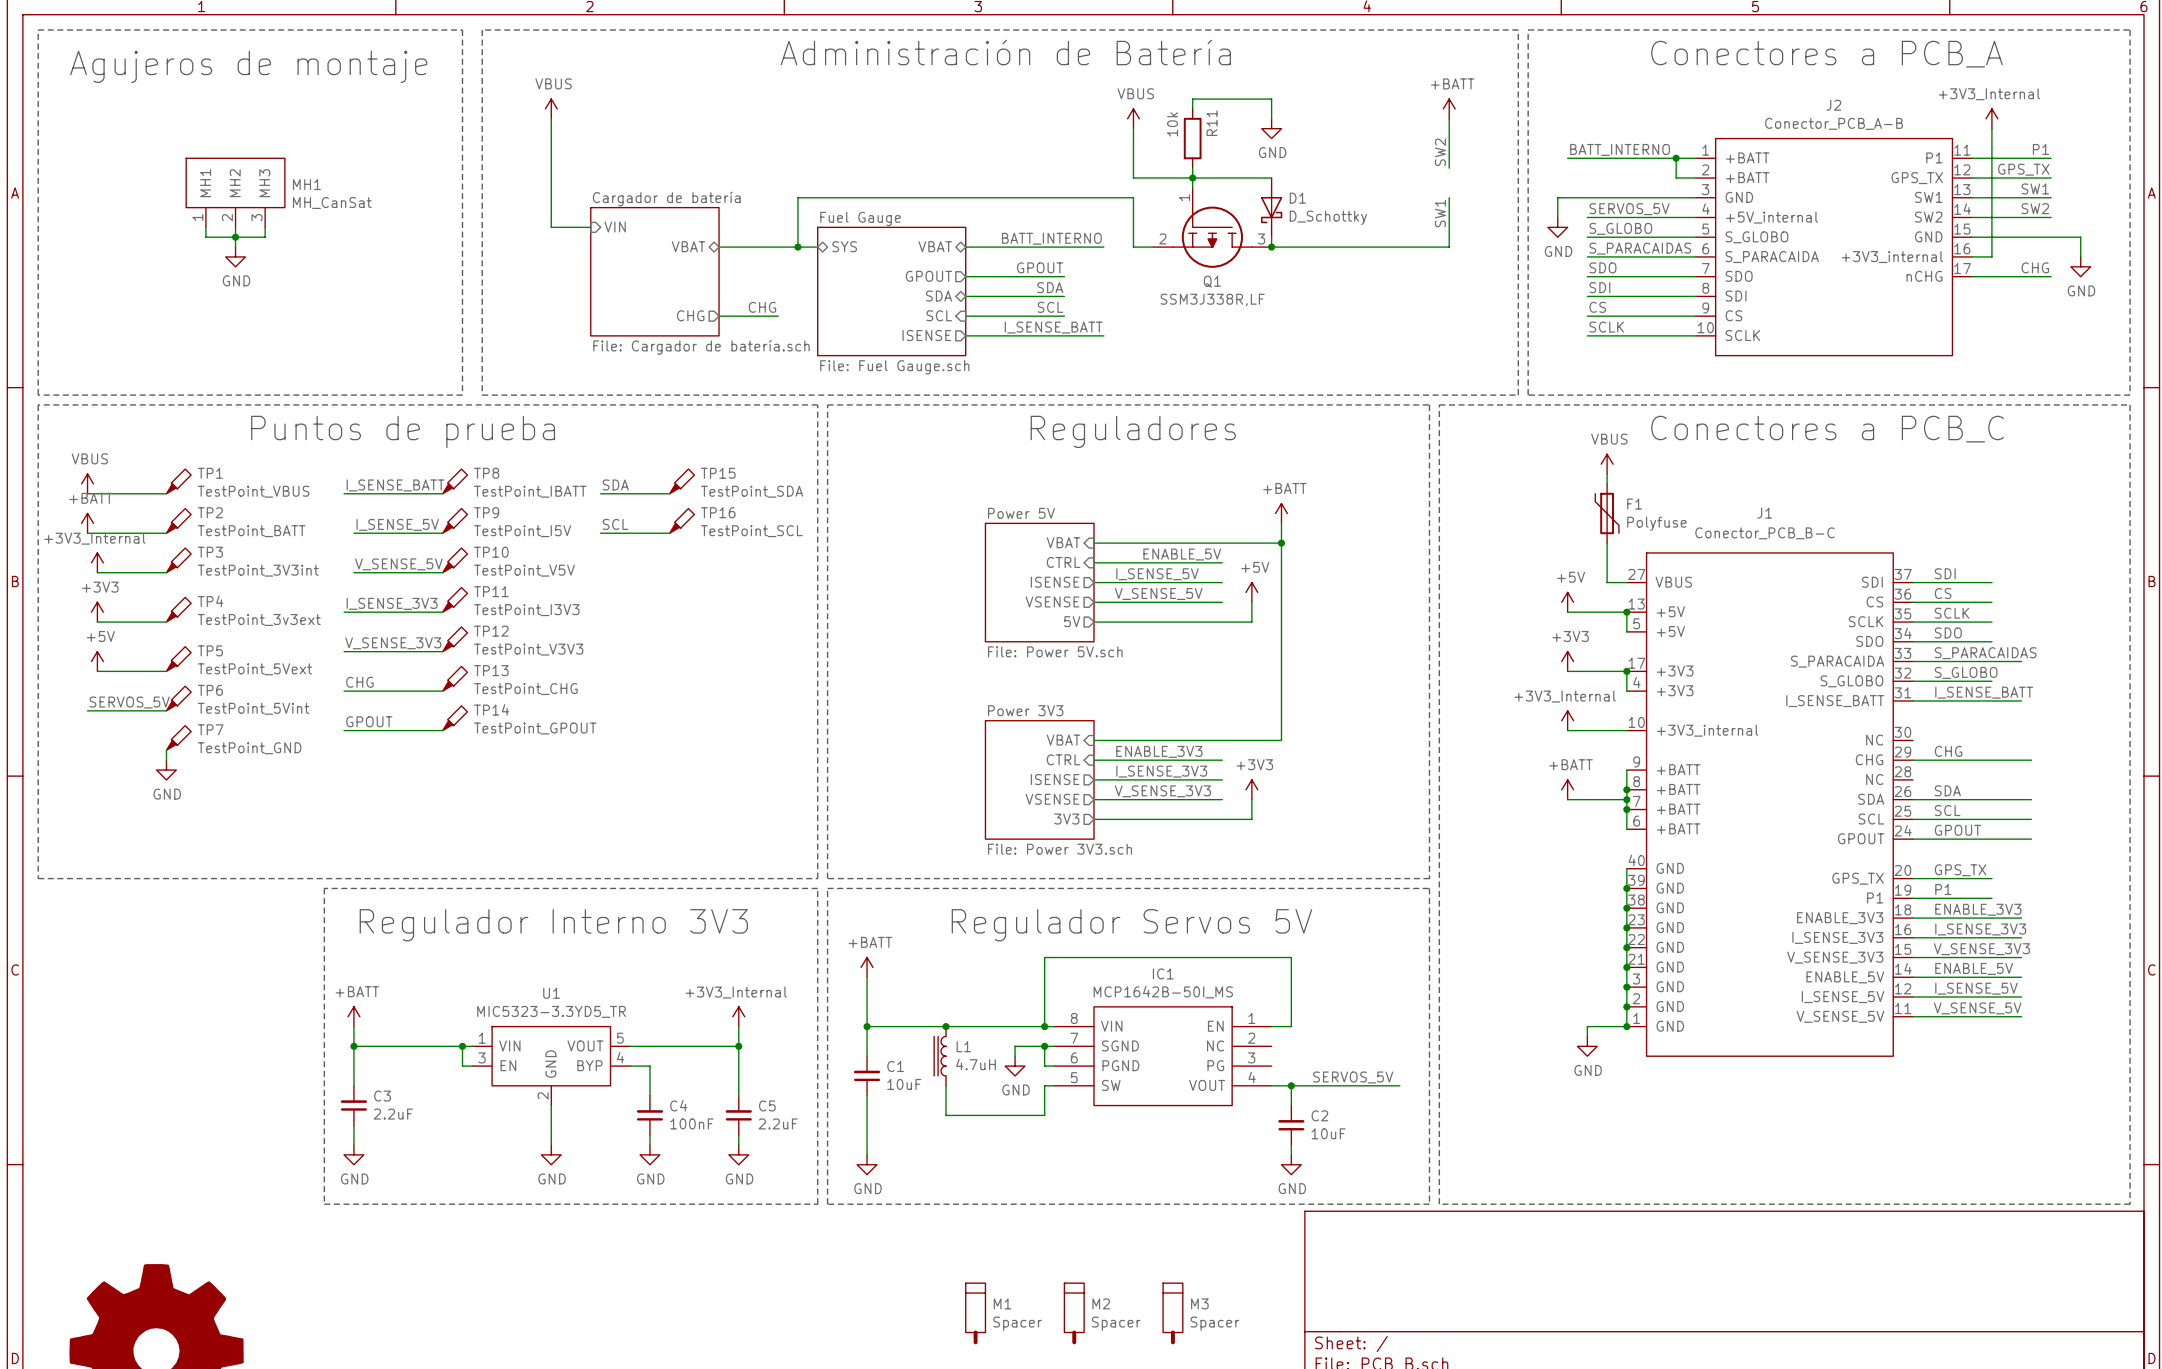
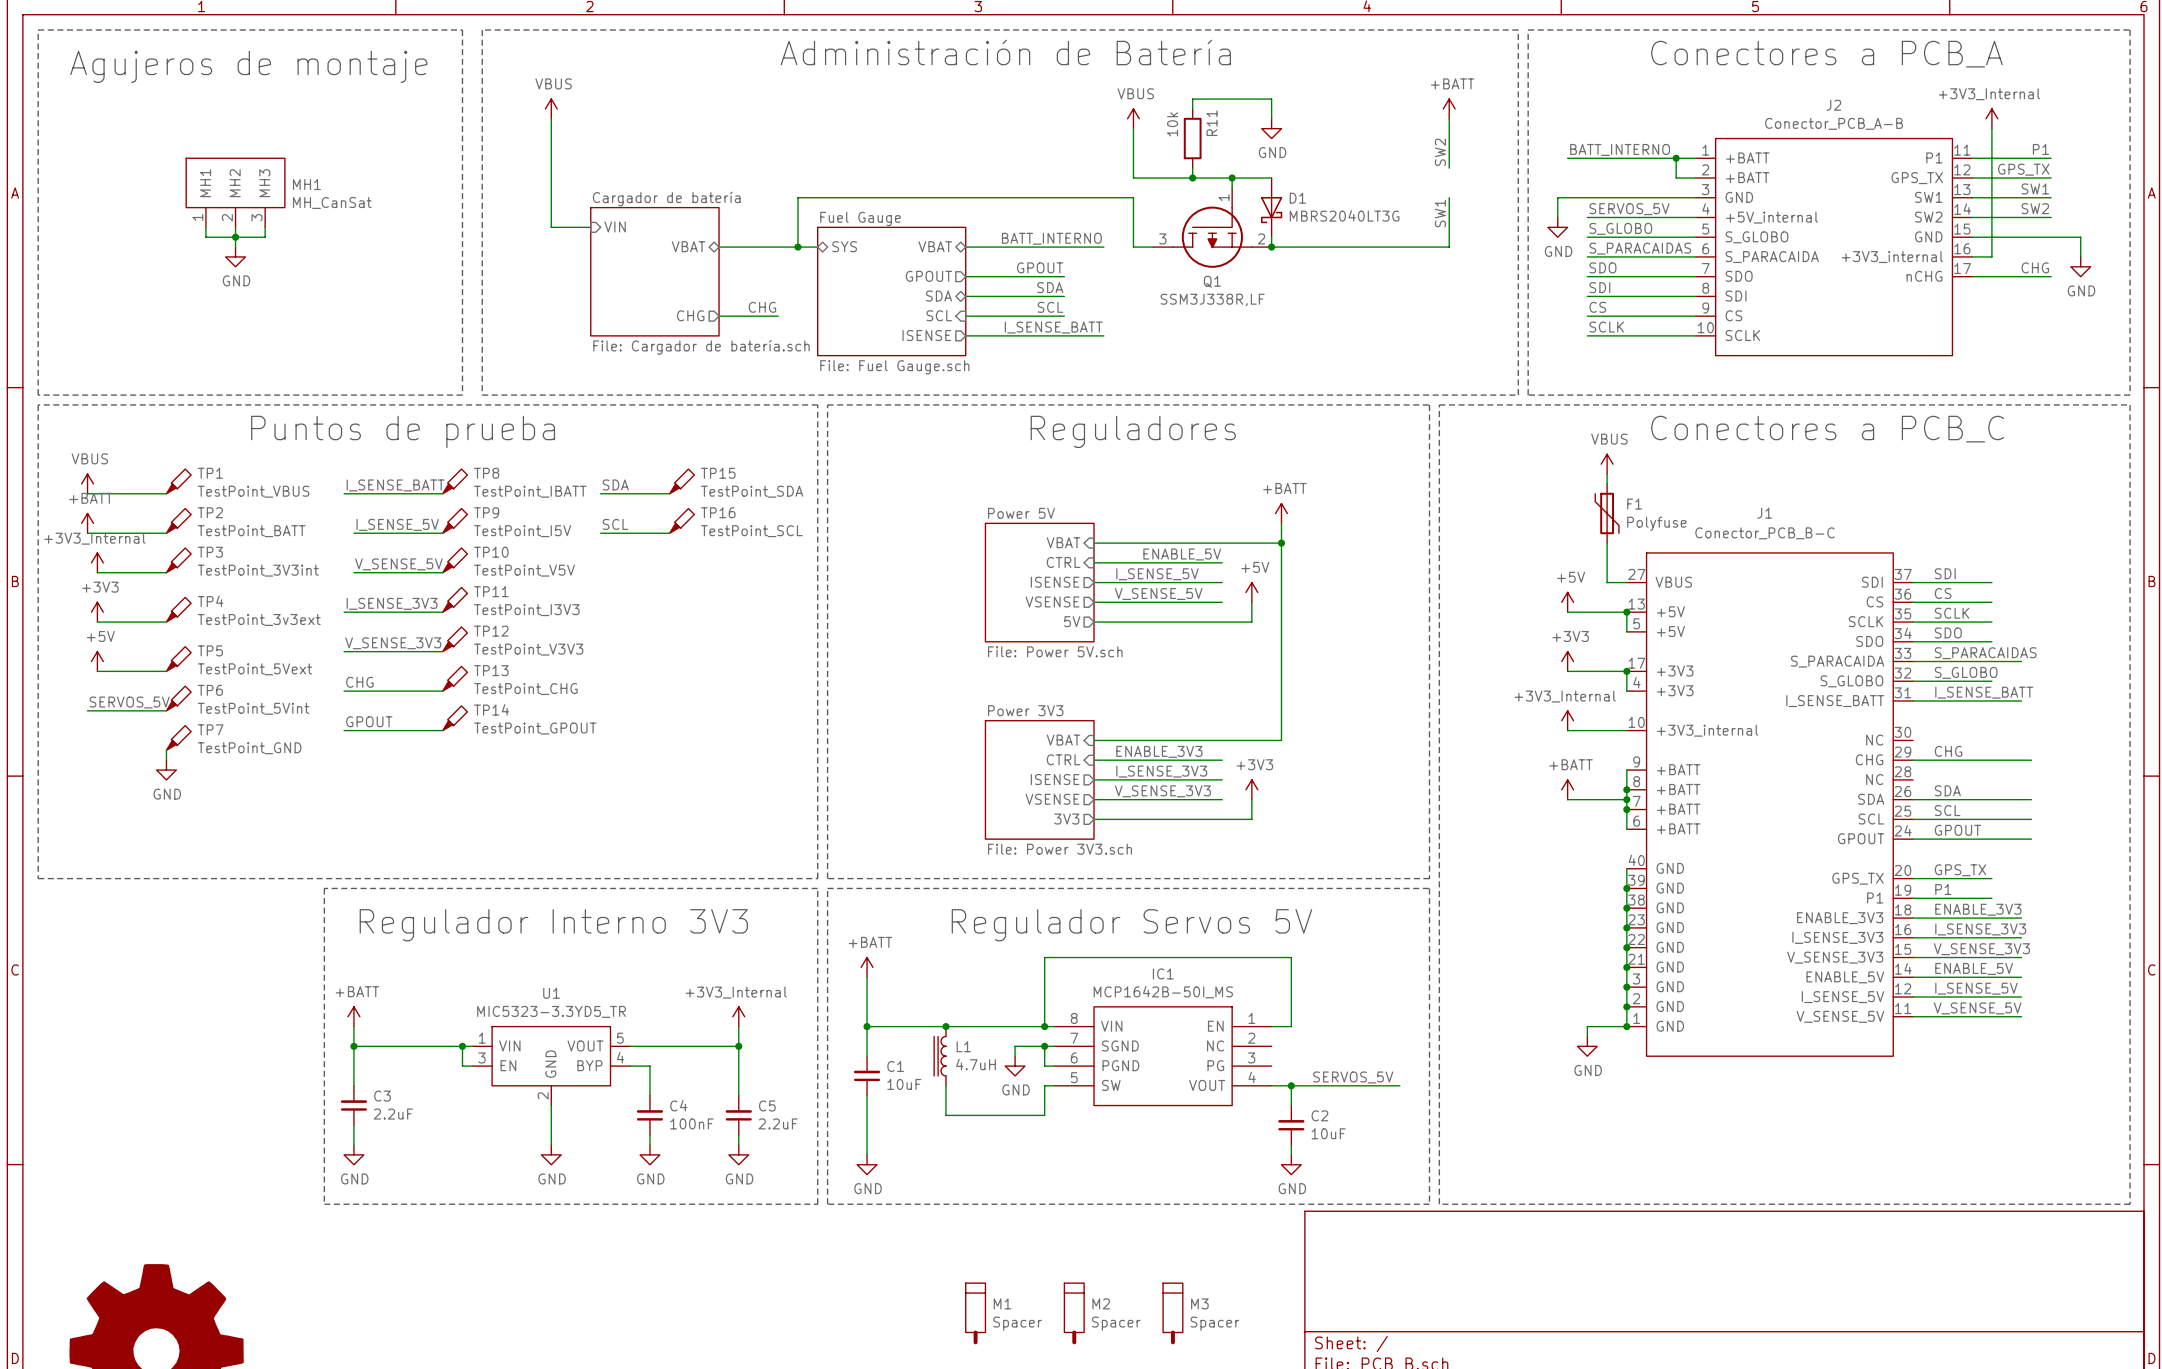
wire: (1192, 178) (1192, 187) -> (1232, 178) (1232, 187)
junction: none -> (1232, 178)
D1 value: D_Schottky (1328, 217) -> MBRS2040LT3G (1344, 215)
Q1 flip: as is (1212, 237) -> left-right (1212, 237)

